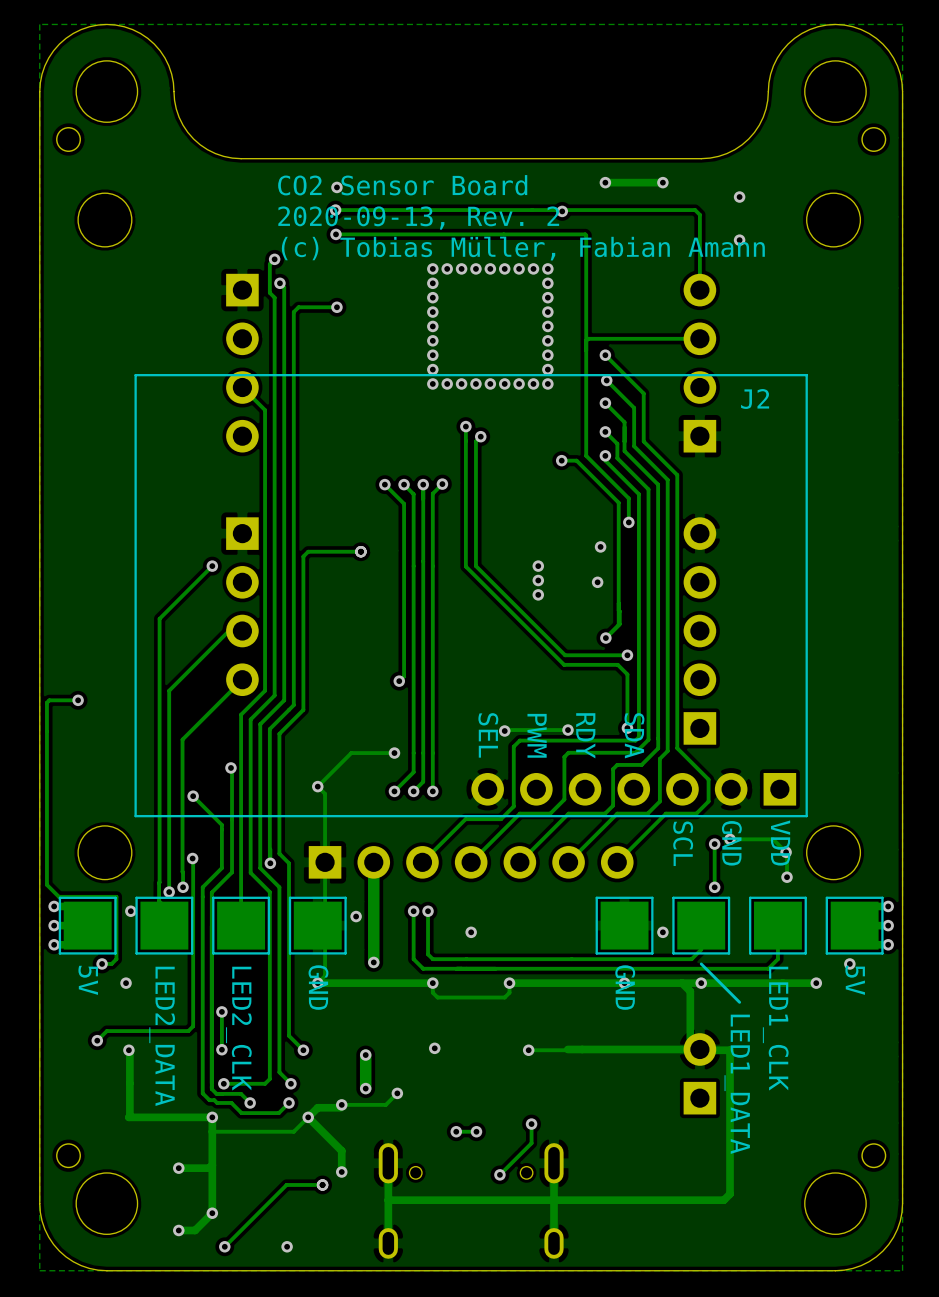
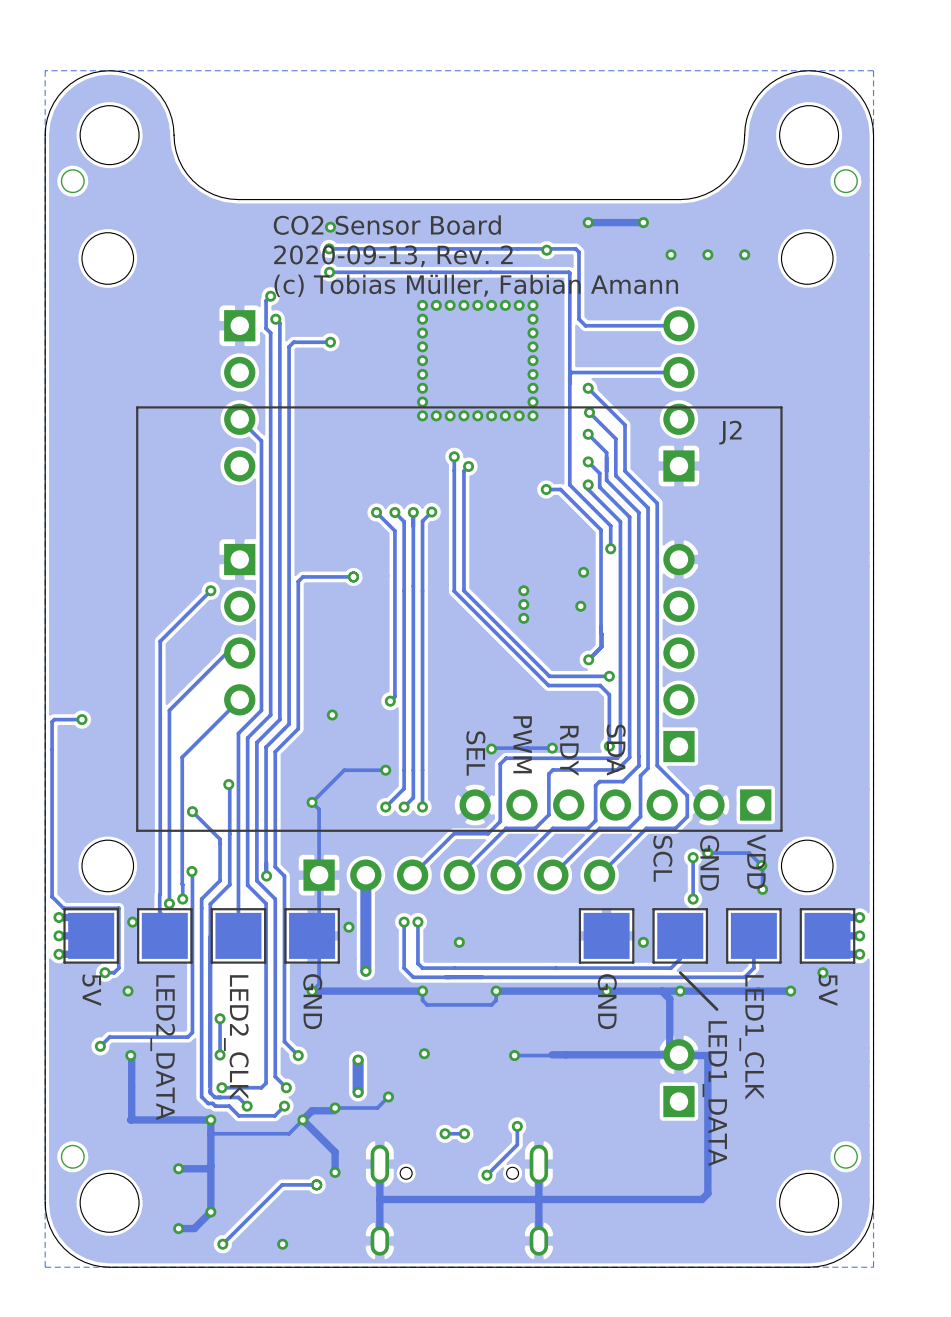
via: (739, 197) -> none
track: (592, 210) (695, 210) (699, 214) (699, 290) -> (575, 248) (579, 252) (579, 319) (585, 325) (678, 325)
via: none -> (671, 254)
via: none -> (707, 254)
via: none -> (744, 254)
via: (739, 240) -> none
via: none -> (332, 715)

